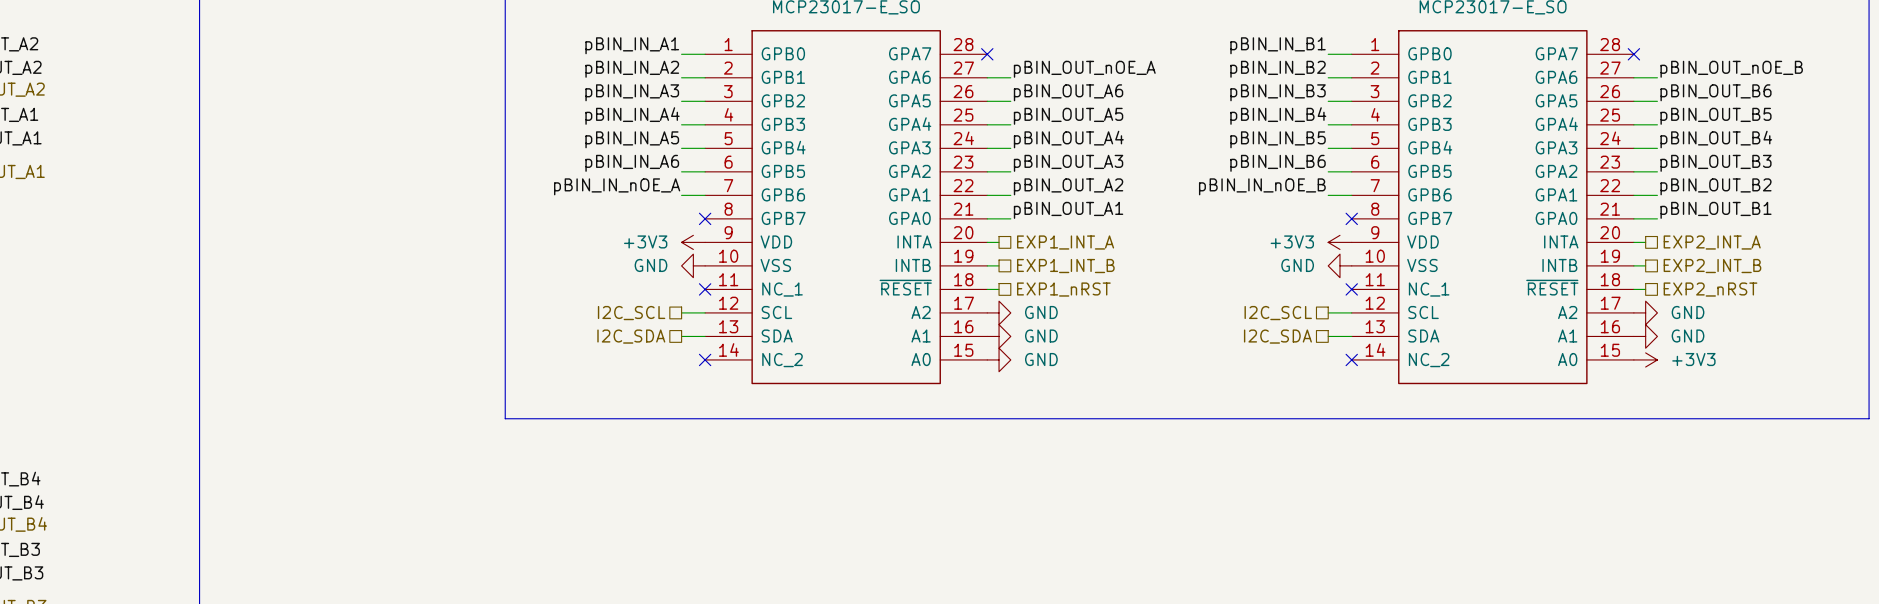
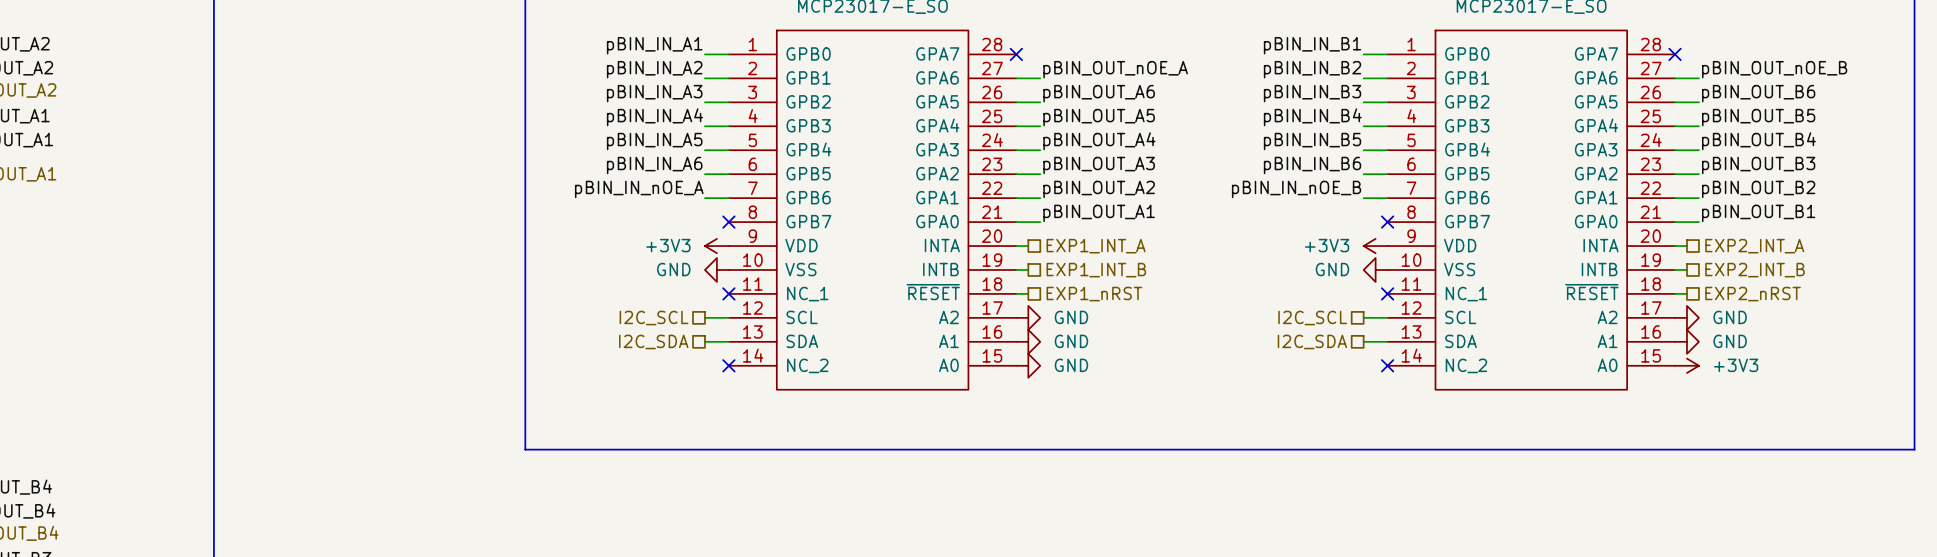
line: (505, 418) (1869, 418) -> (525, 425) (525, 449) (1914, 449) (1914, 425)

